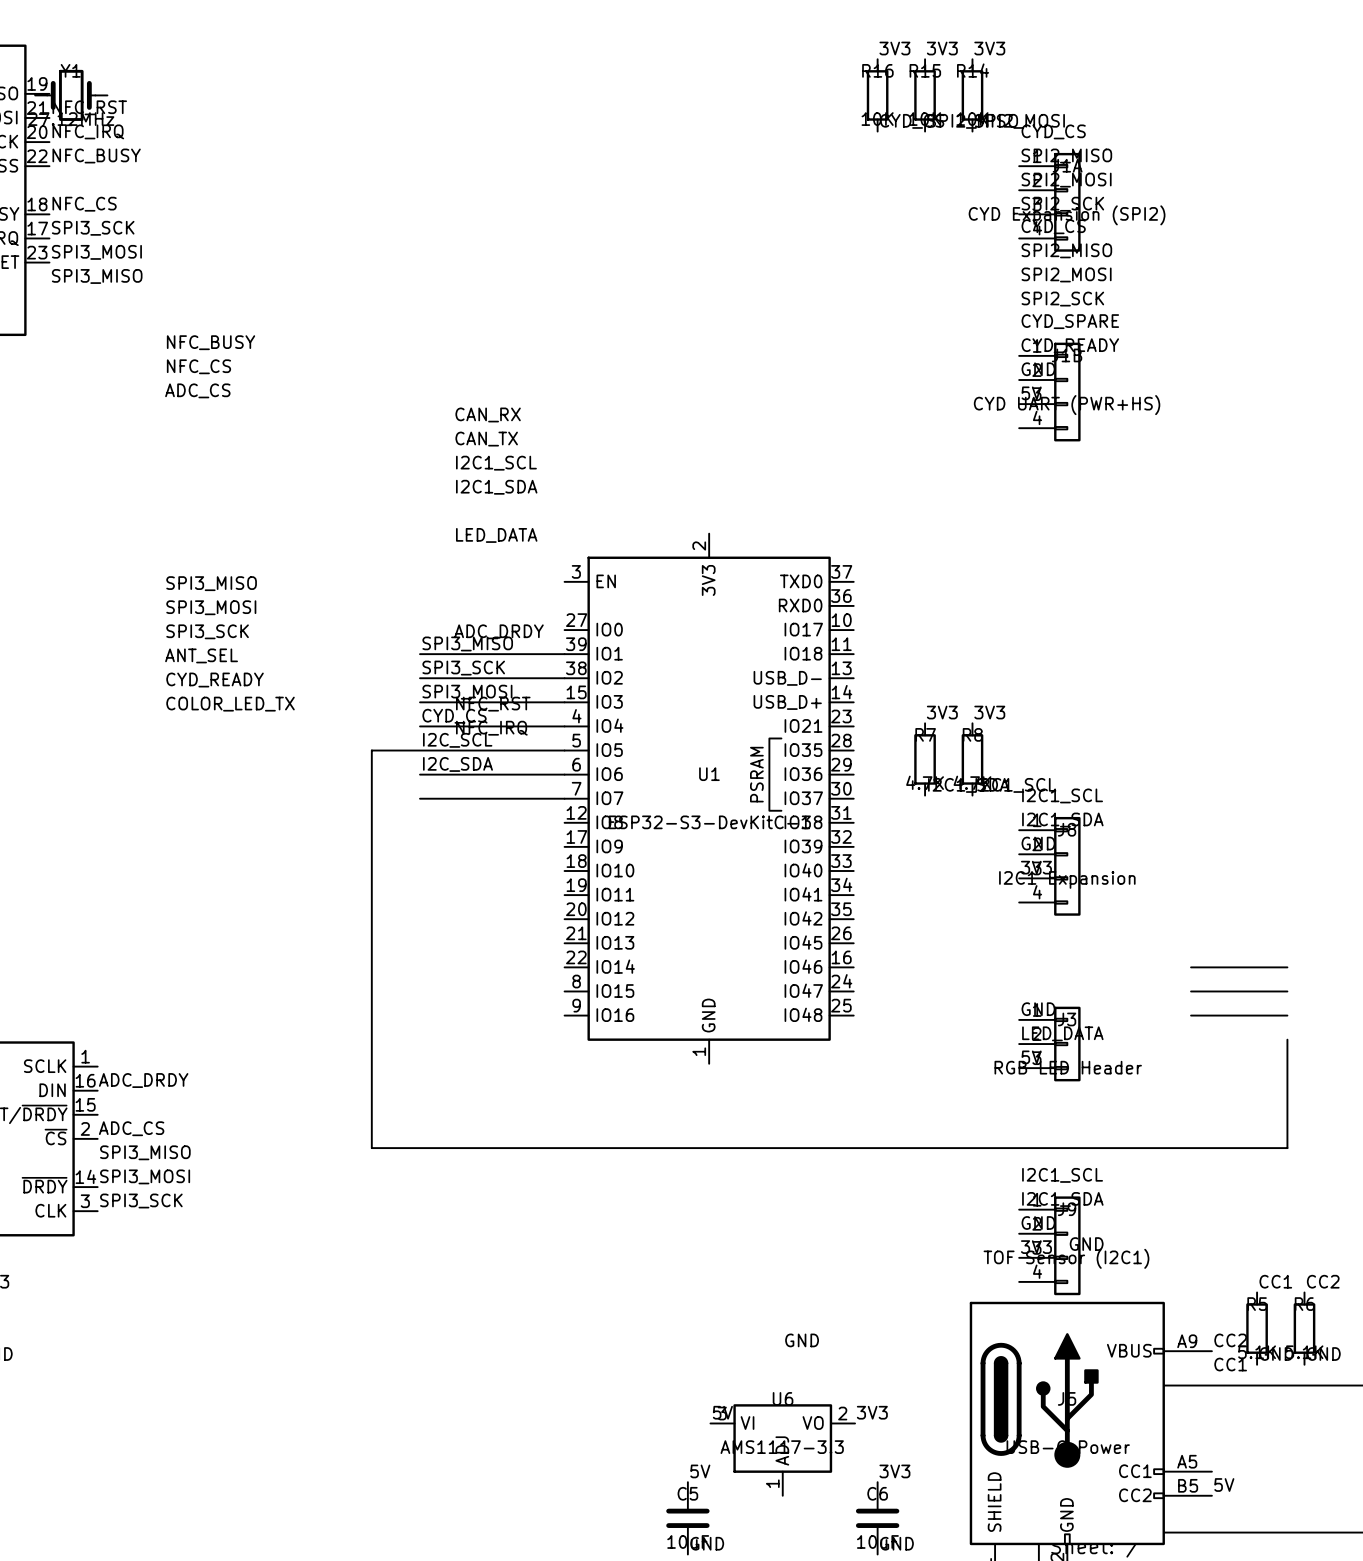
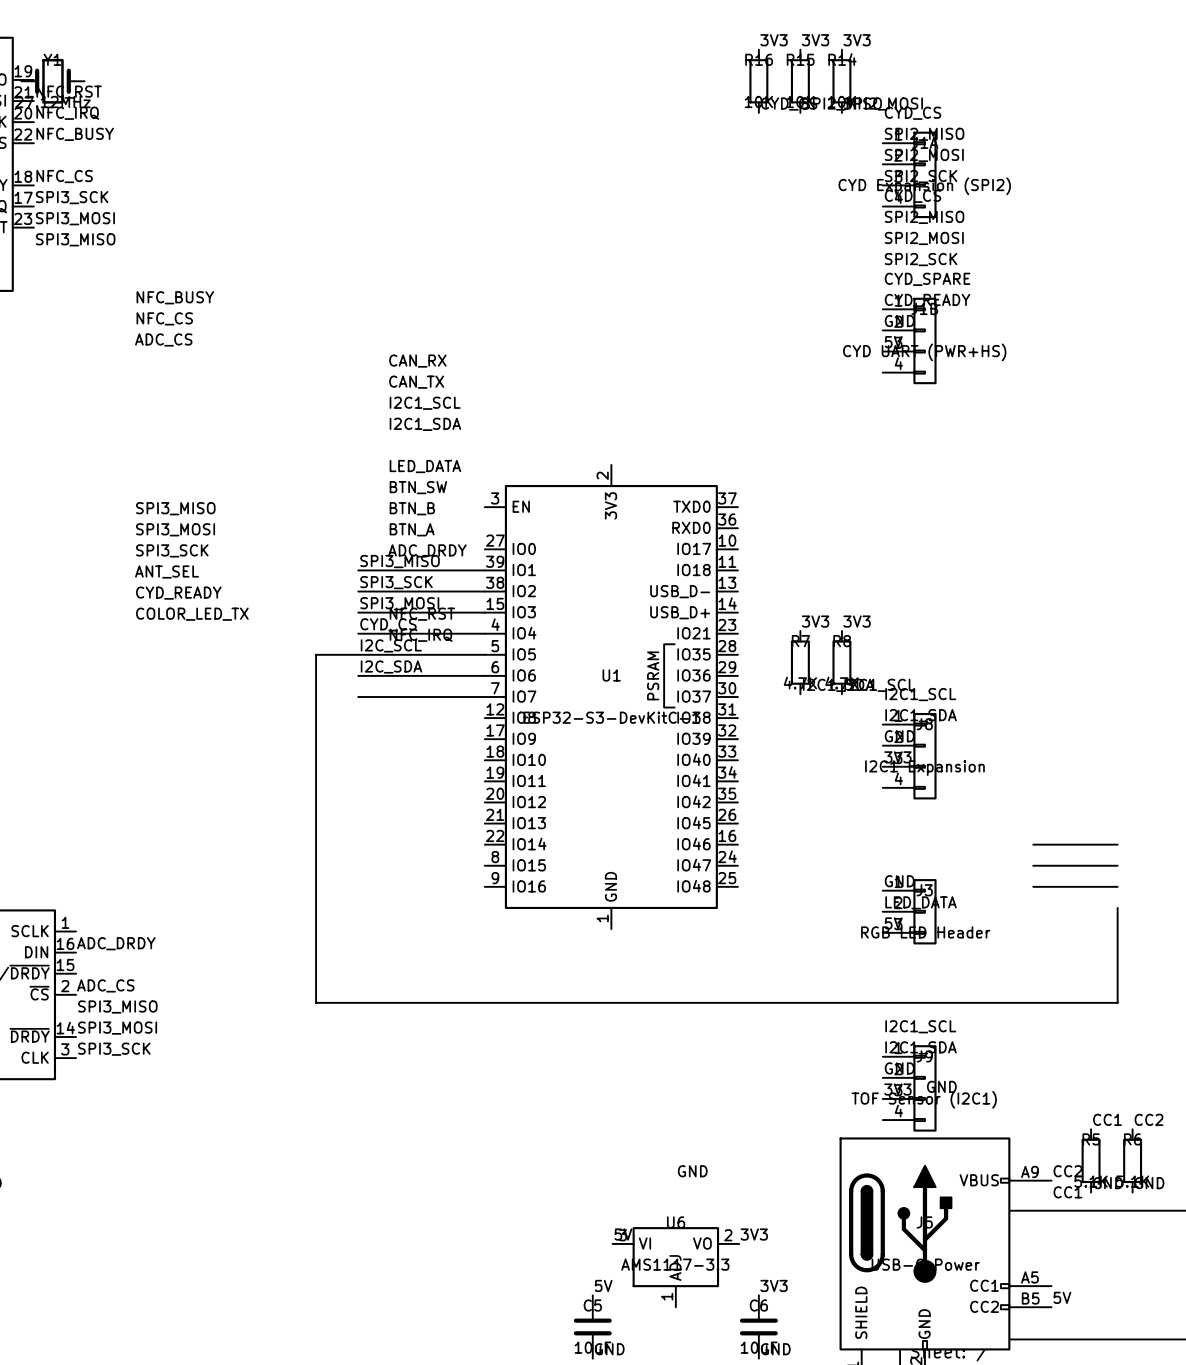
label: none -> BTN_SW (418, 487)
label: none -> BTN_B (412, 508)
label: none -> BTN_A (412, 529)

